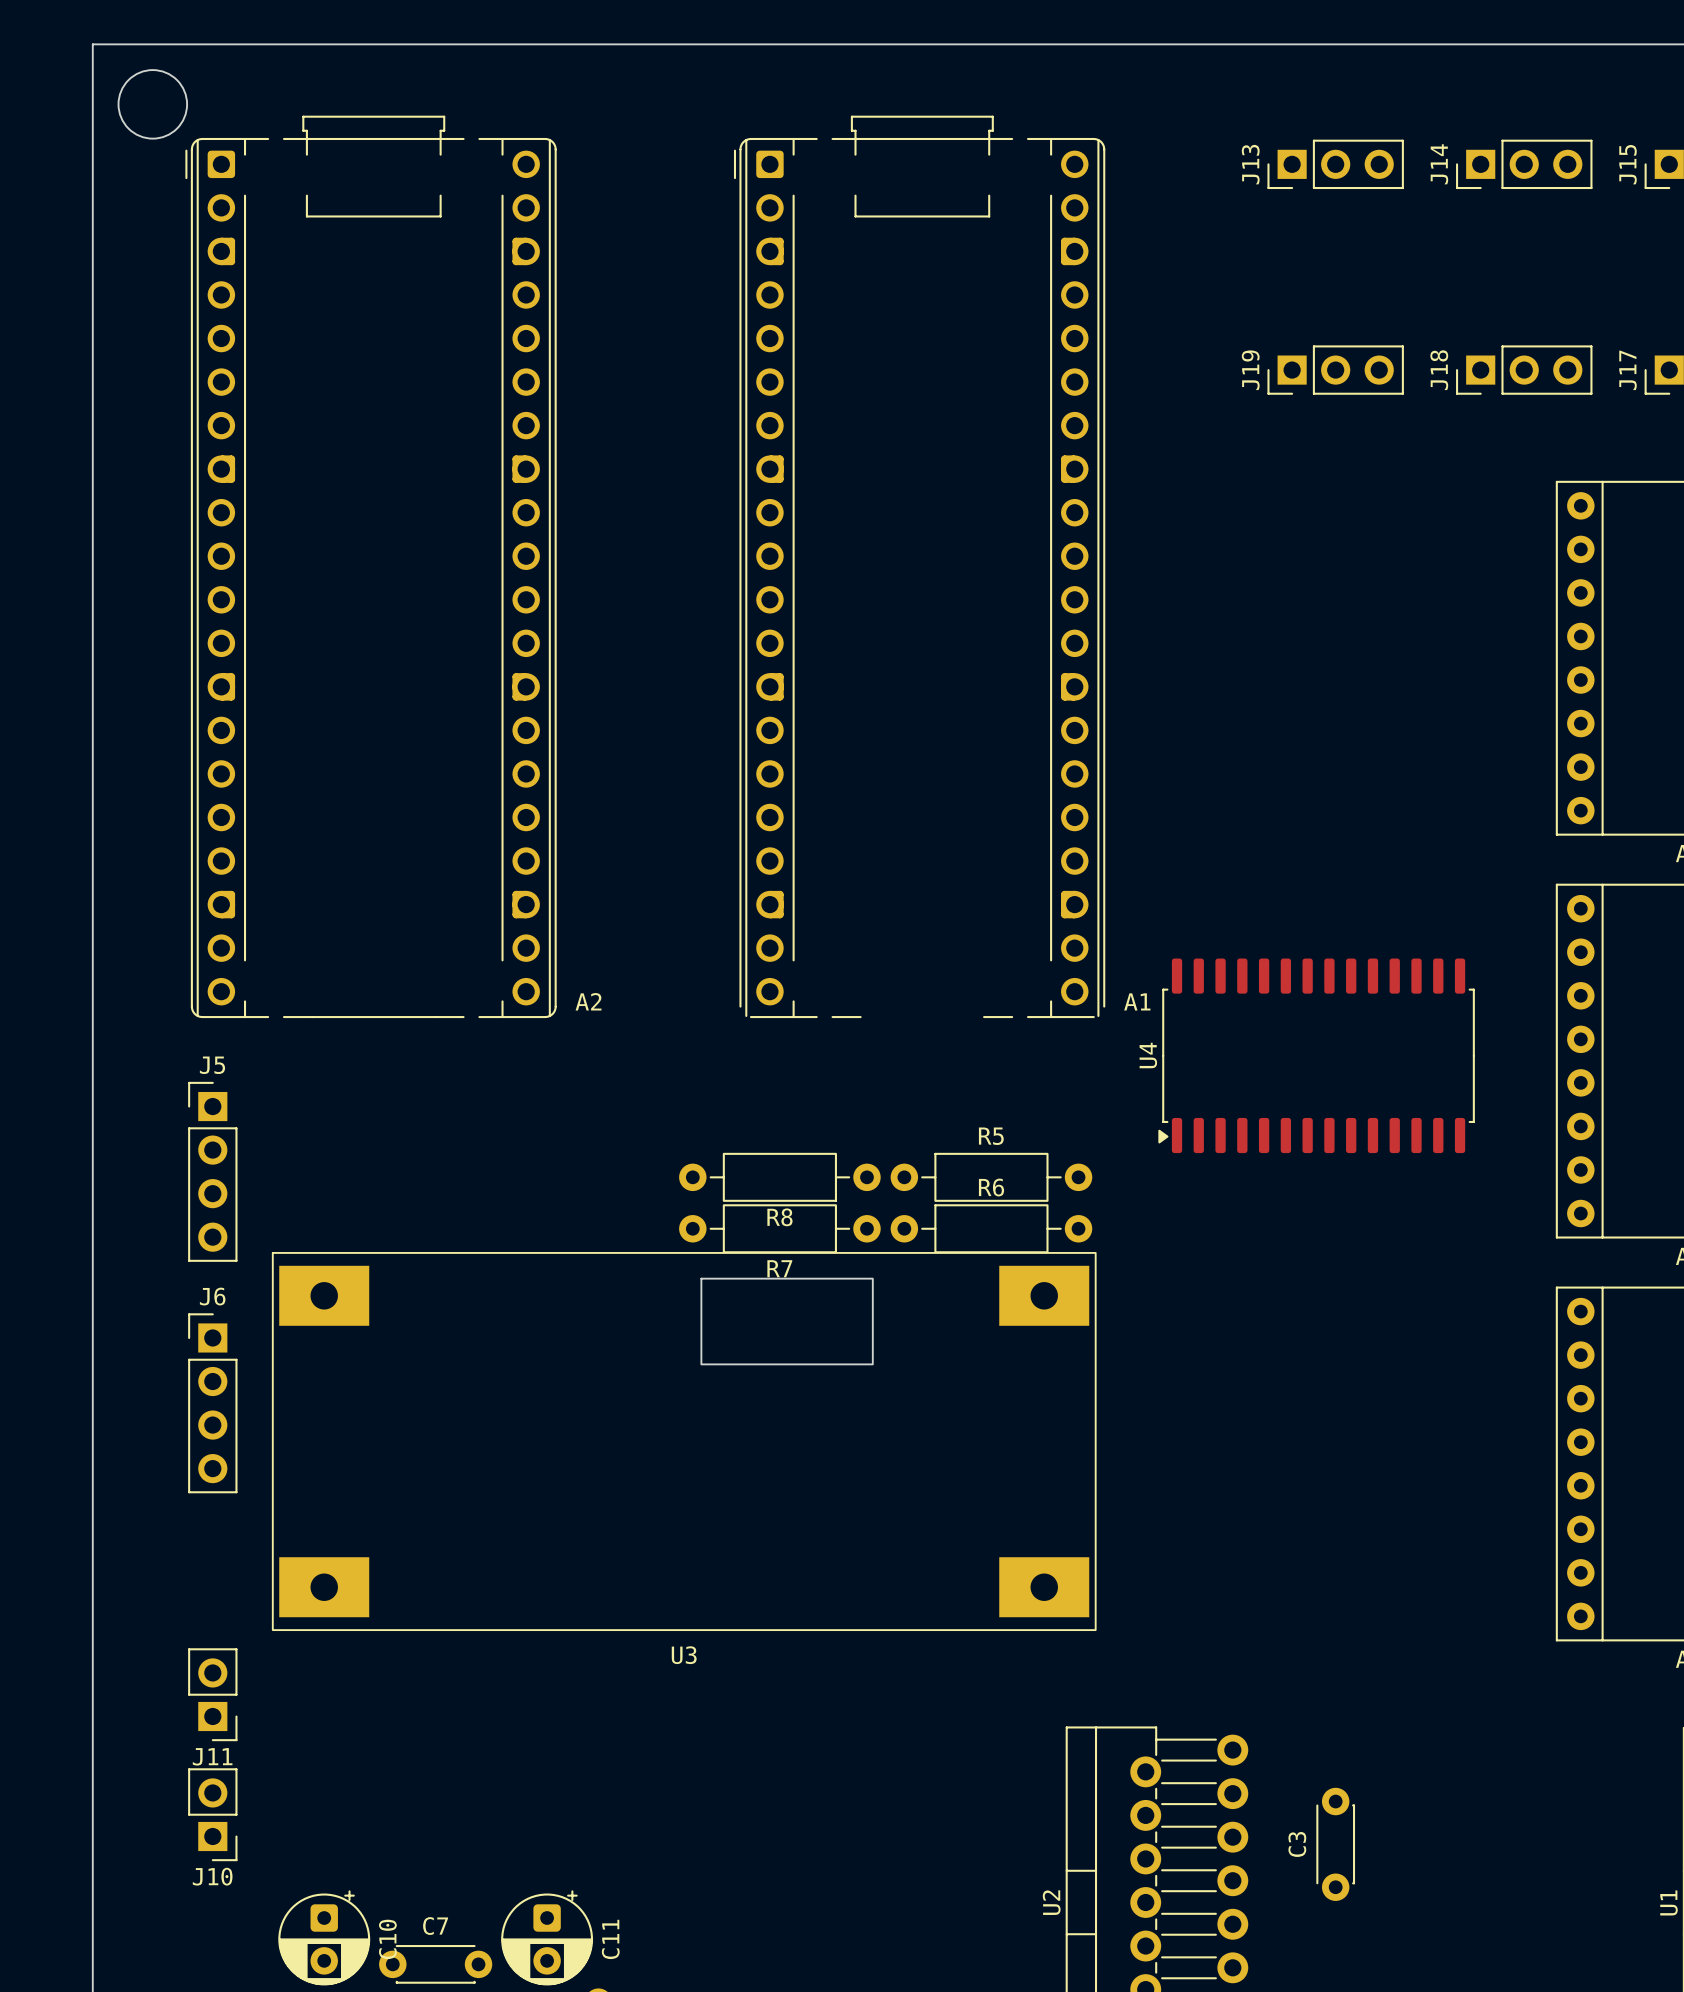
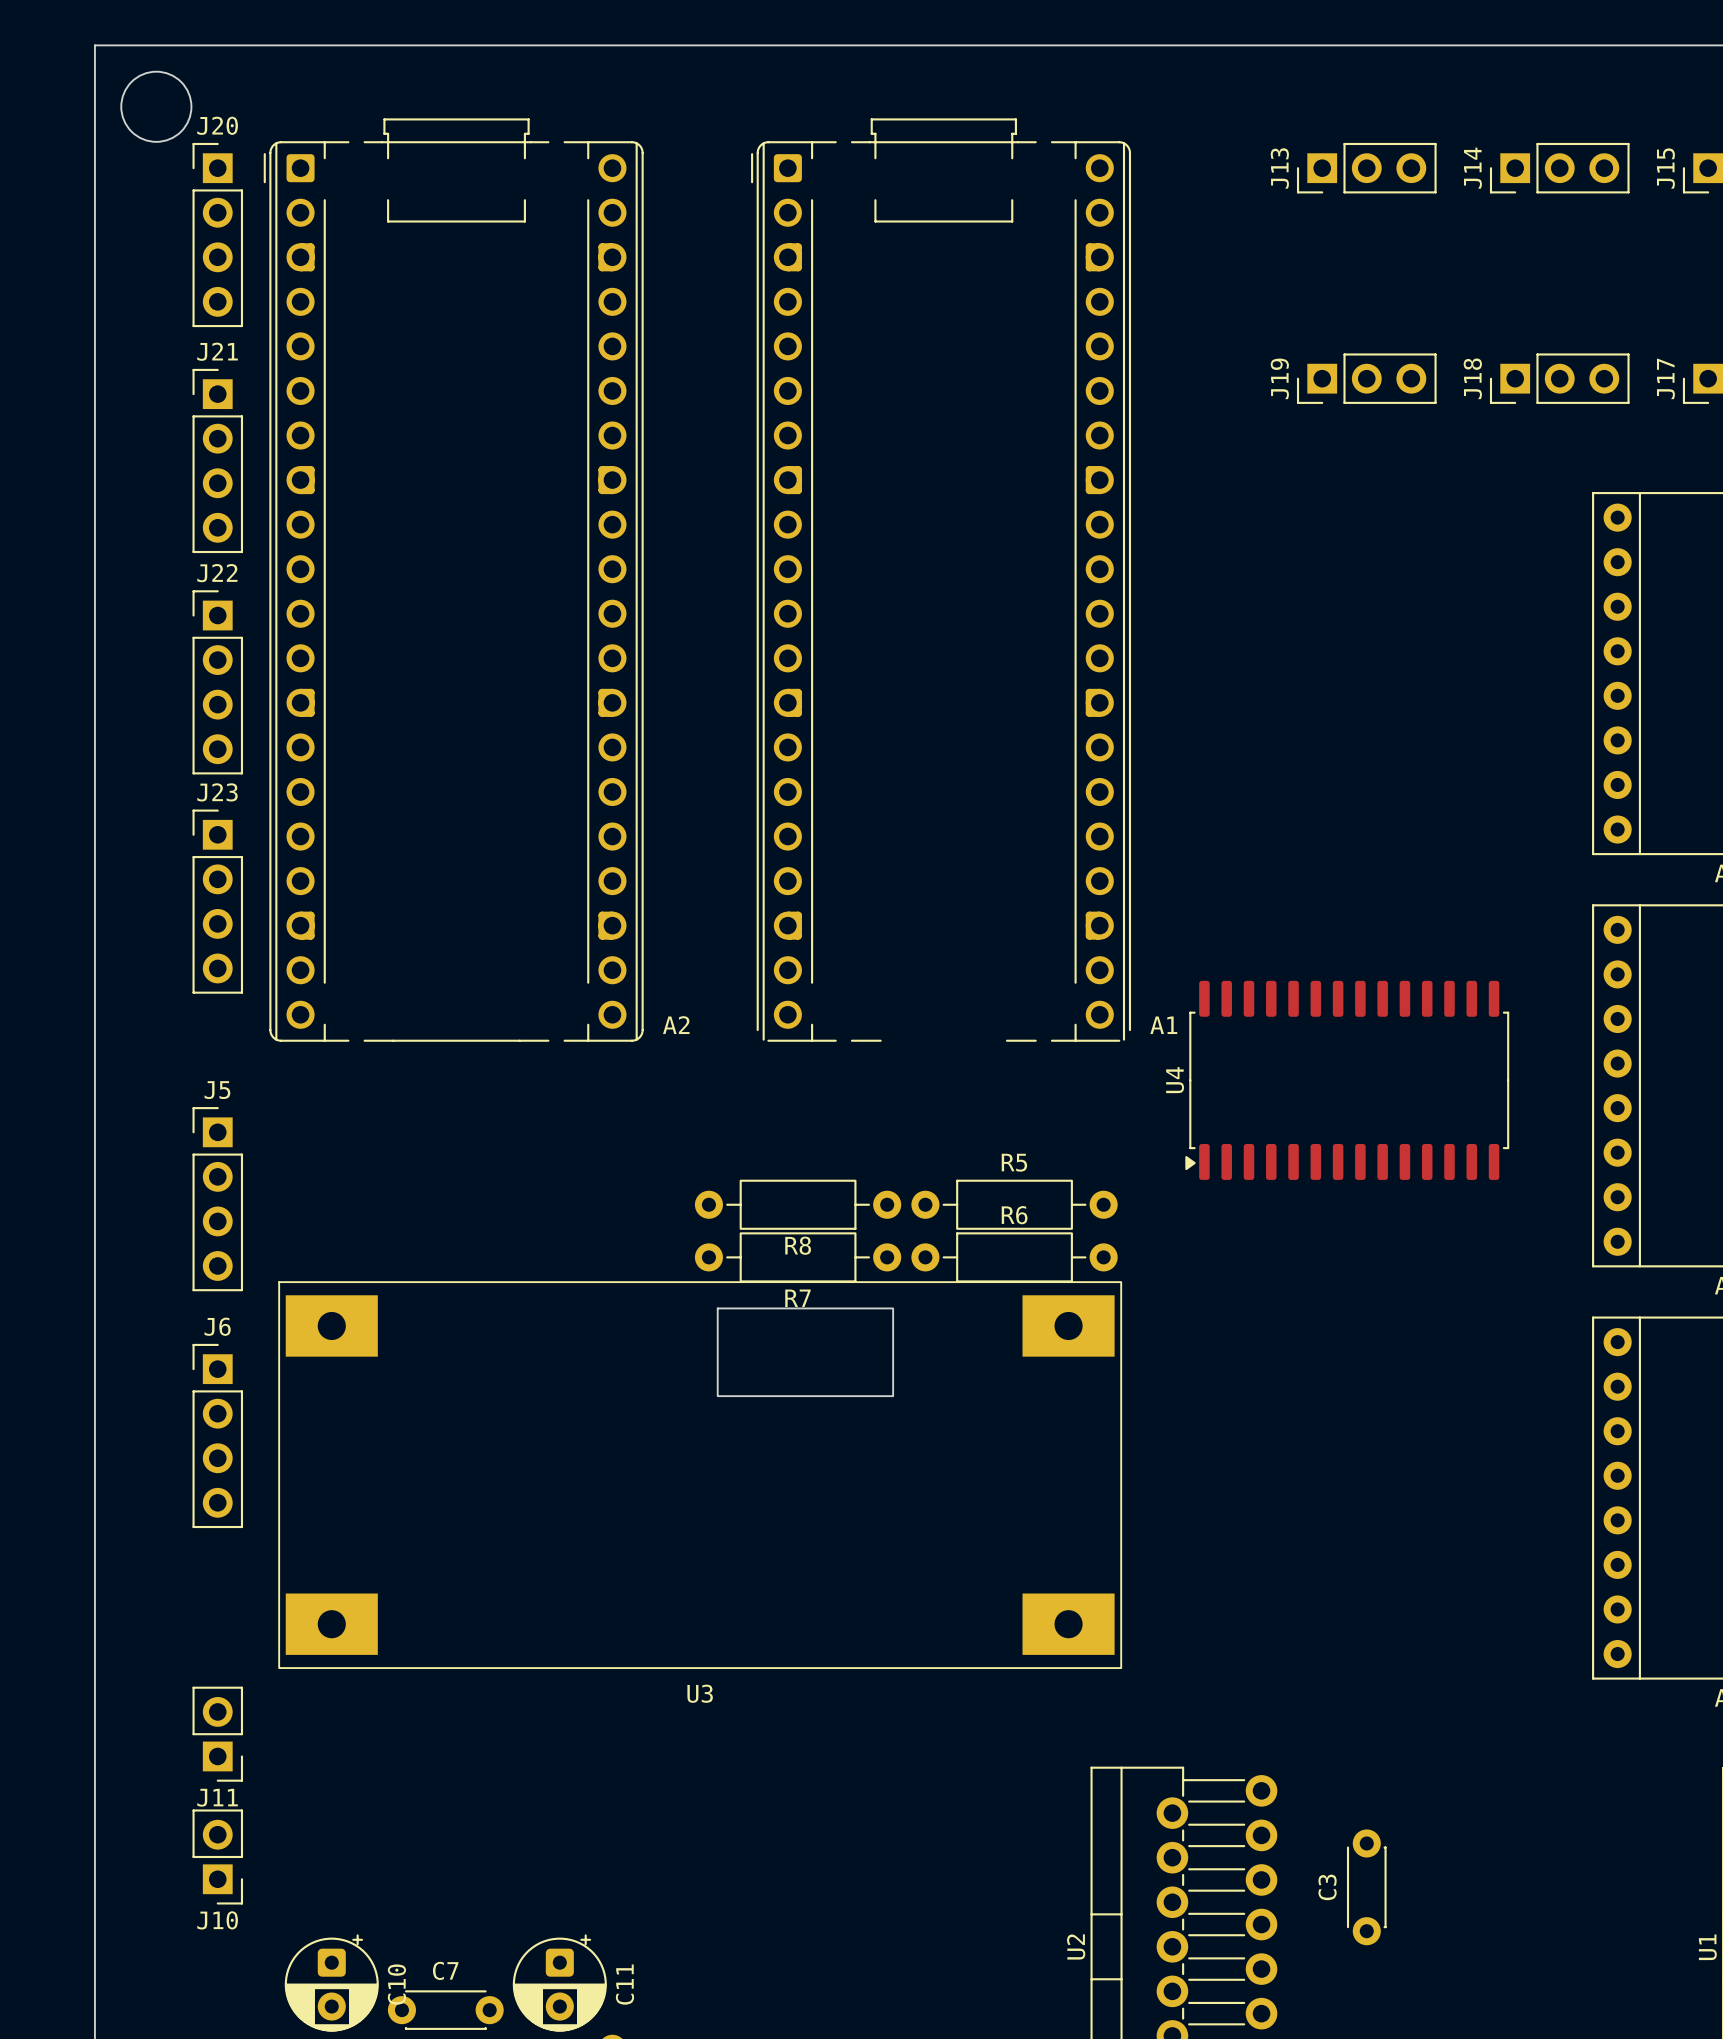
J20: none -> (217, 235)
J21: none -> (217, 460)
A2 position: (371, 566) -> (453, 580)
J22: none -> (217, 682)
J23: none -> (217, 901)

